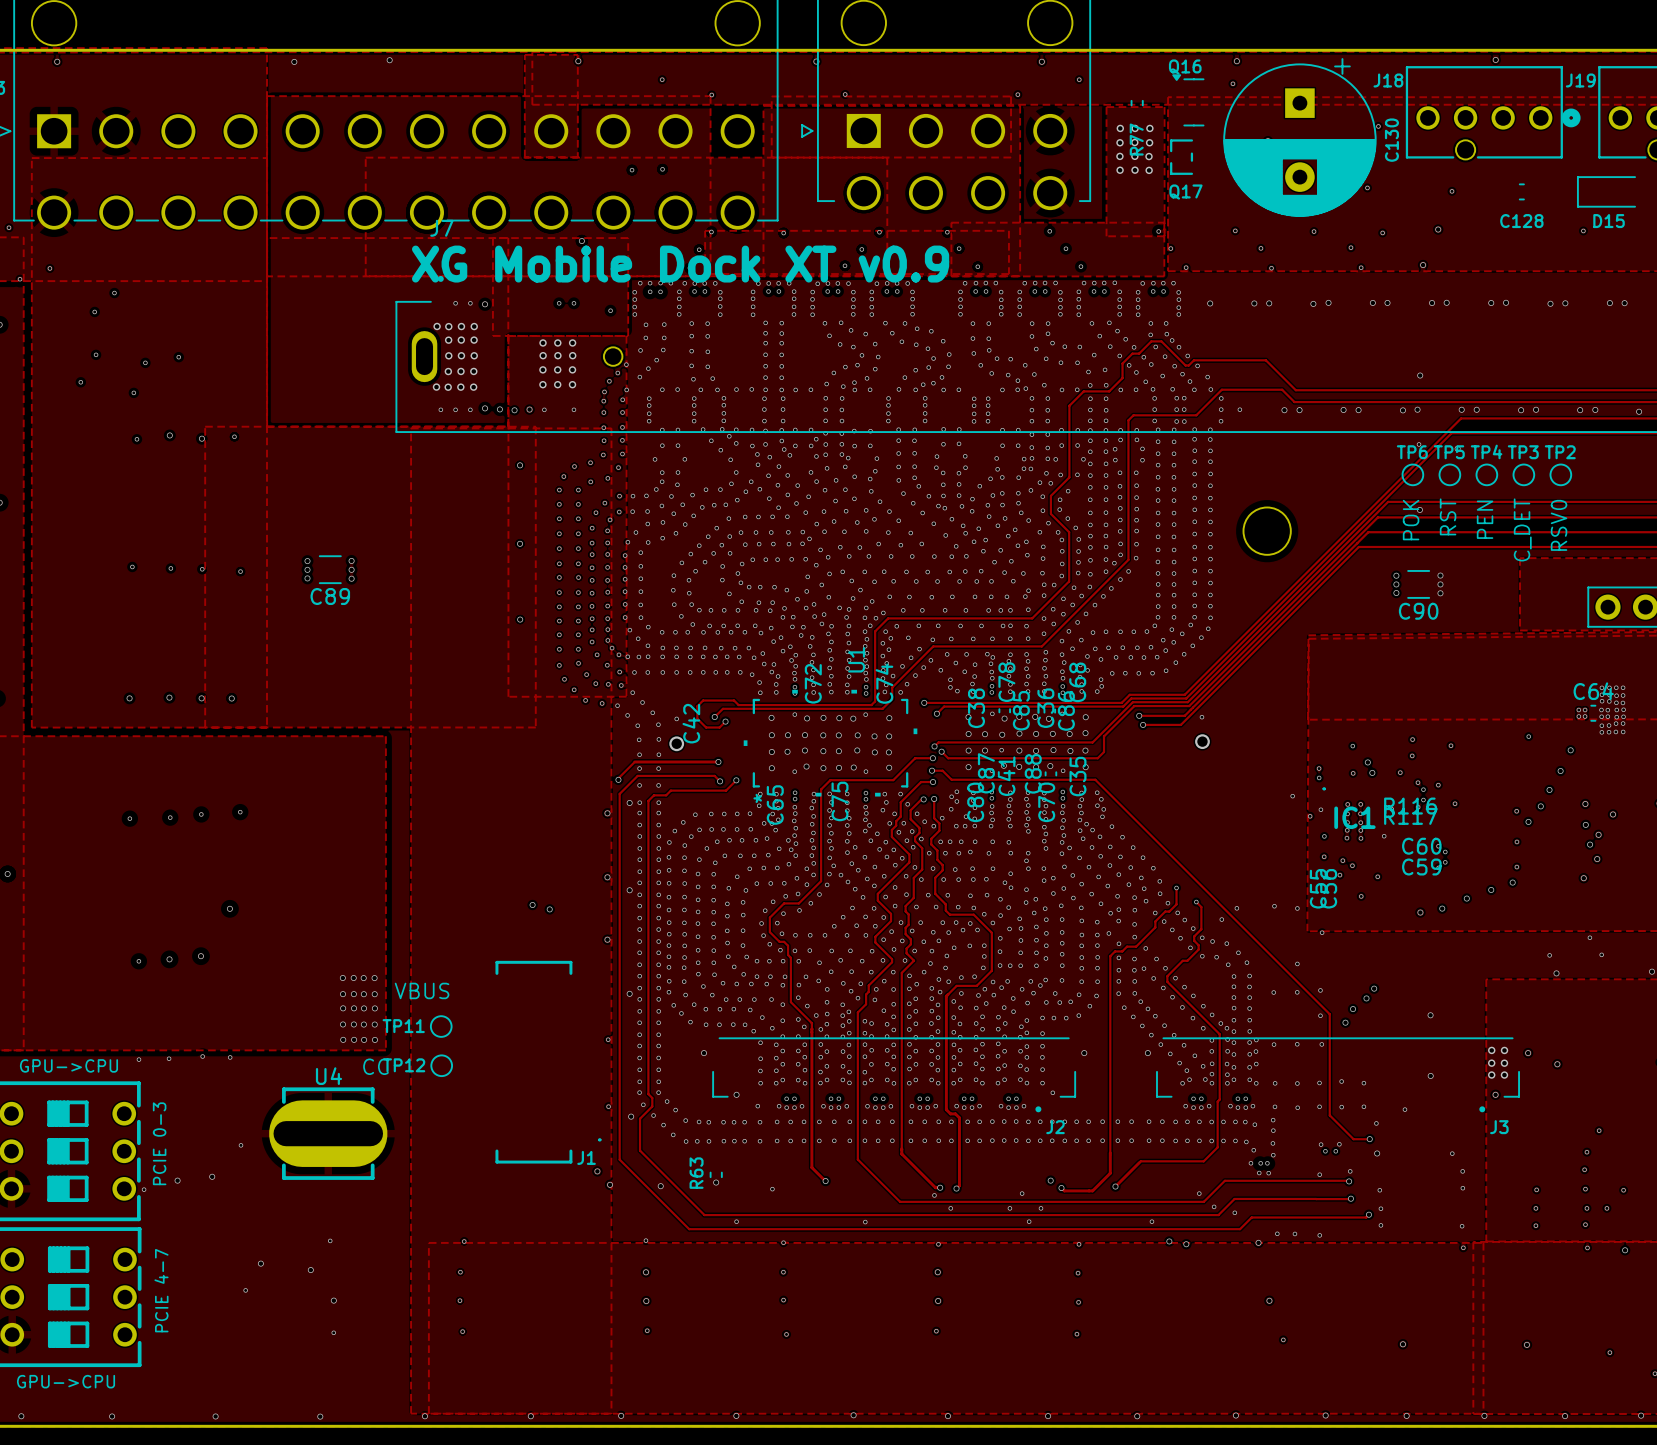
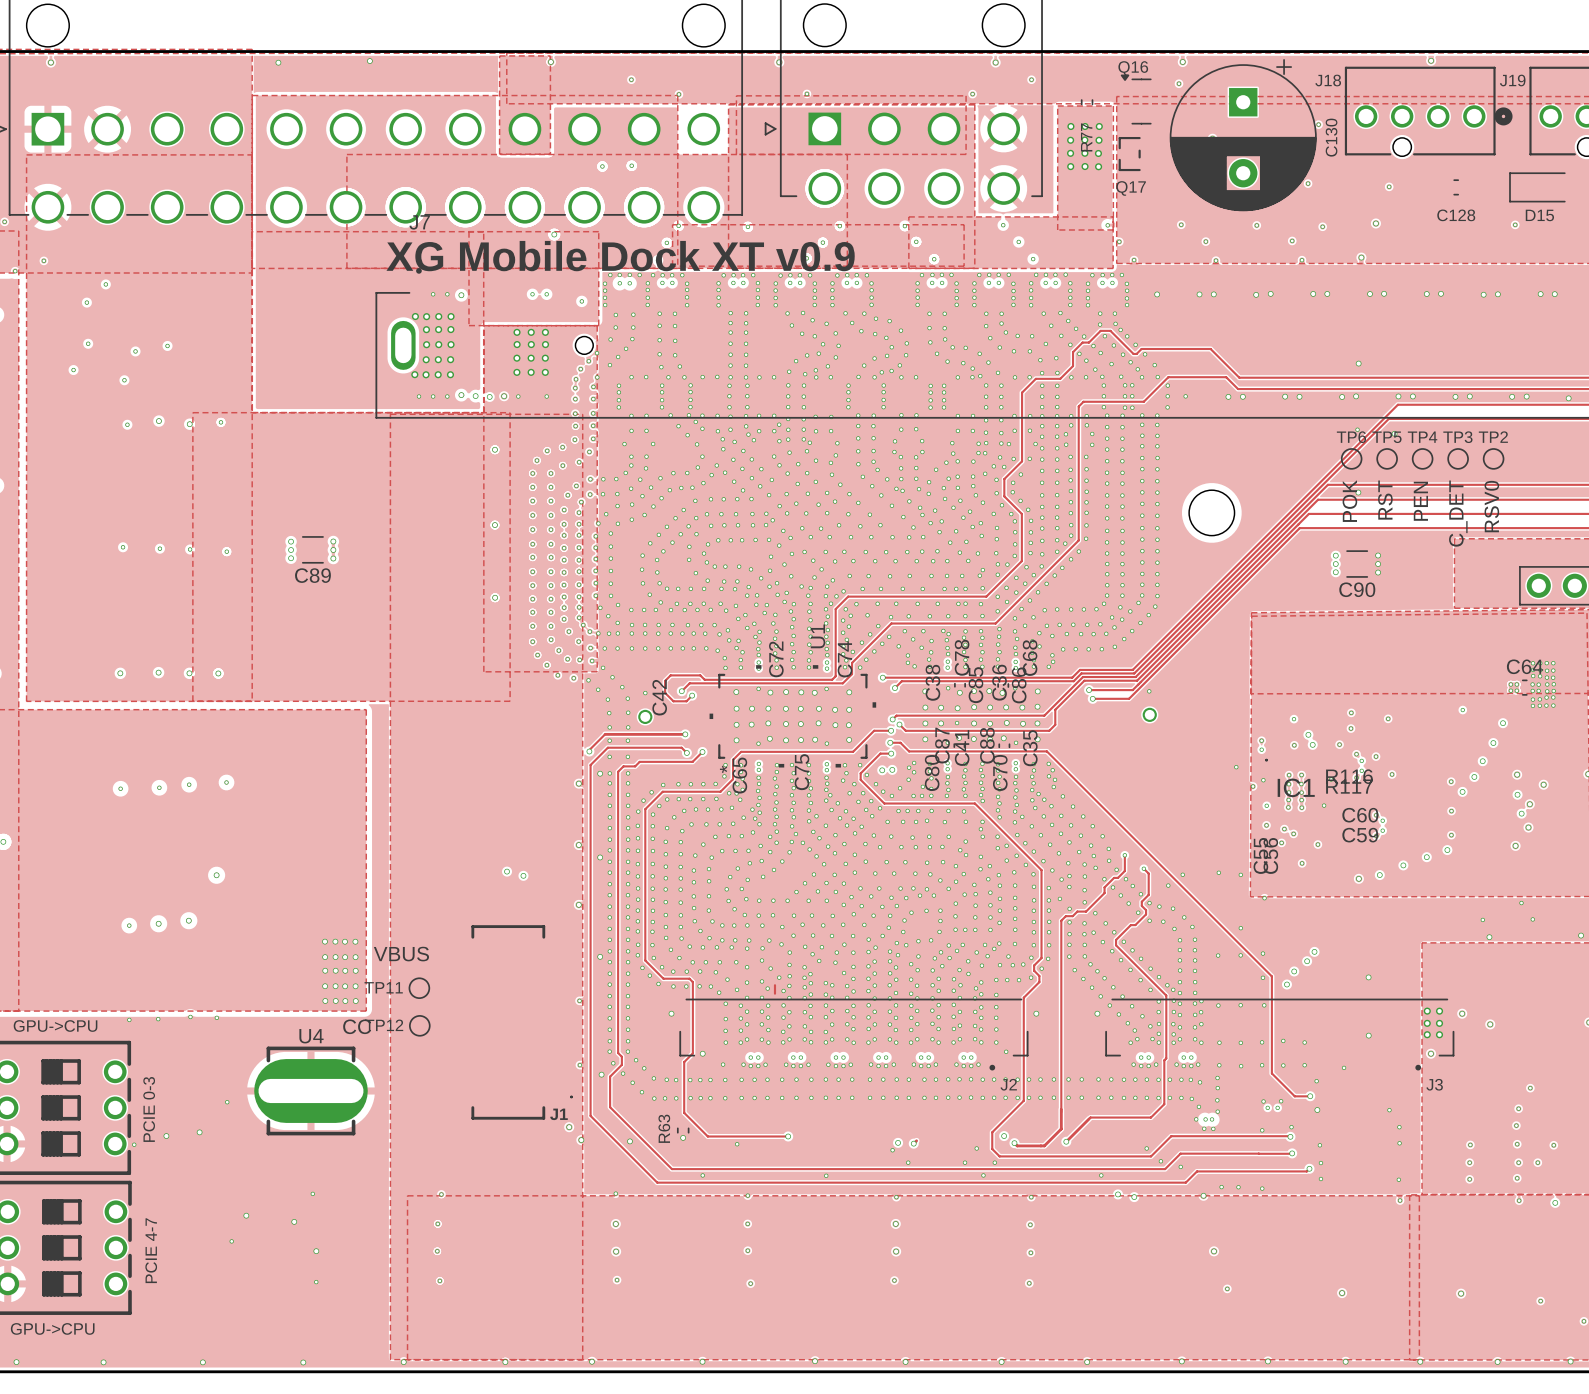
track: (830, 780) (821, 789) (821, 881) (798, 903) (784, 903) (769, 917) (769, 932) (779, 941) (784, 941) (788, 945) (788, 955) (790, 957) (790, 1002) (812, 1023) -> (792, 751) (741, 751) (733, 759) (733, 779) (720, 791) (662, 791) (645, 809) (645, 960) (663, 978) (689, 978) (692, 982) (692, 1053) (684, 1062) (684, 1112) (707, 1136) (788, 1136)
track: (921, 782) (900, 802) (900, 816) (891, 829) (891, 836) (909, 854) (909, 862) (877, 893) (877, 900) (891, 913) (891, 921) (875, 936) (875, 942) (892, 959) (892, 962) (868, 985) (866, 1004) (857, 1012) (857, 1159) (900, 1201) (1046, 1201) -> (880, 753) (860, 773) (860, 779) (884, 803) (974, 803) (1041, 870) (1041, 958) (1034, 965) (1034, 970) (1039, 976) (1039, 982) (1023, 997) (1023, 1100) (992, 1132) (992, 1149) (999, 1156)
track: (934, 798) (934, 818) (939, 823) (939, 830) (931, 838) (931, 844) (937, 850) (937, 859) (942, 865) (942, 870) (935, 877) (935, 893) (945, 904) (945, 910) (949, 914) (973, 914) (991, 932) (991, 970) (976, 985) (956, 985) (945, 996) -> none
track: (923, 799) (910, 810) (910, 819) (919, 827) (919, 833) (915, 837) (915, 841) (922, 848) (922, 869) (913, 877) (913, 897) (905, 906) (905, 911) (908, 914) (908, 924) (905, 927) (905, 934) (910, 939) (906, 953) (914, 960) (901, 972) (901, 1149) -> none
track: (948, 994) (946, 996) (946, 1109) (959, 1117) (959, 1185) -> none
track: (812, 1028) (811, 1167) (825, 1181) -> none
track: (901, 1148) (901, 1153) (935, 1187) (940, 1187) -> none

